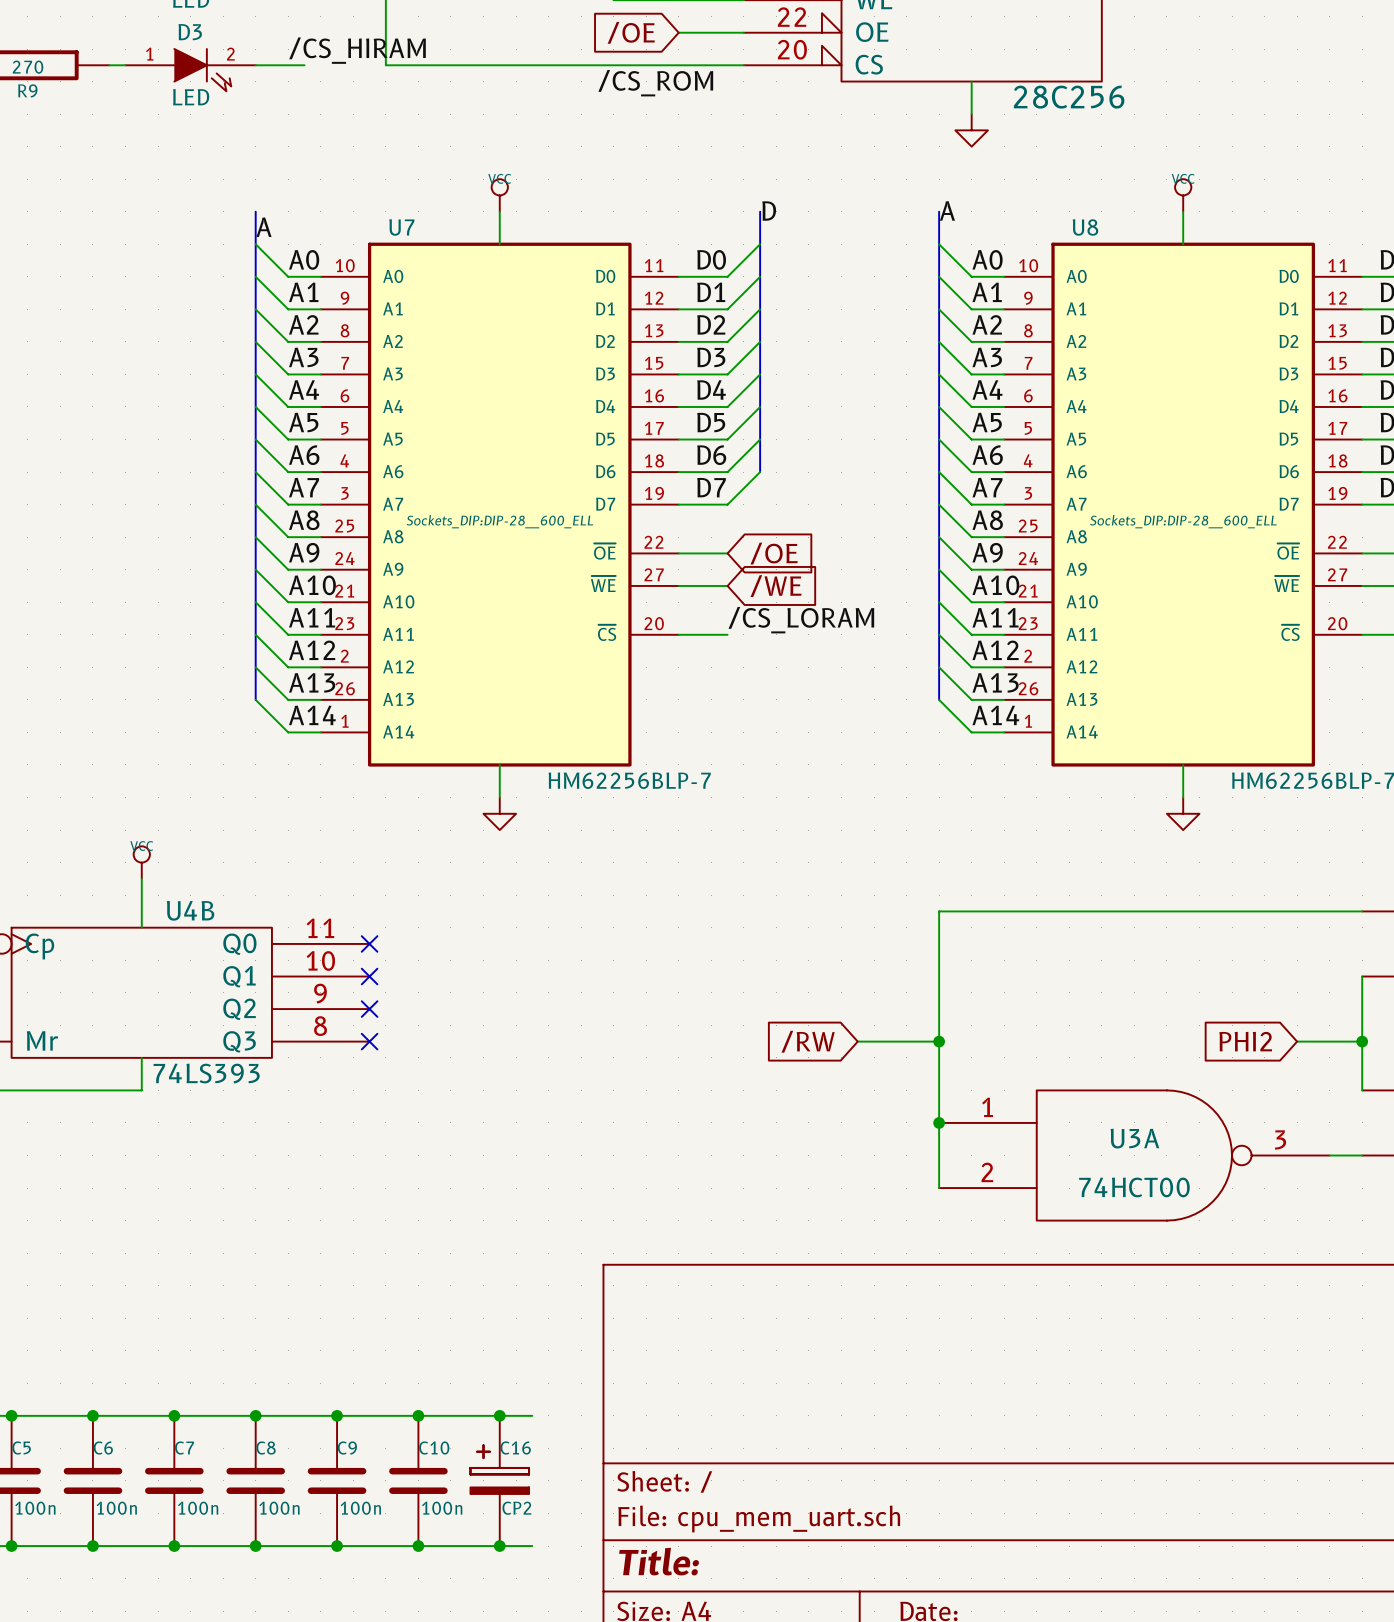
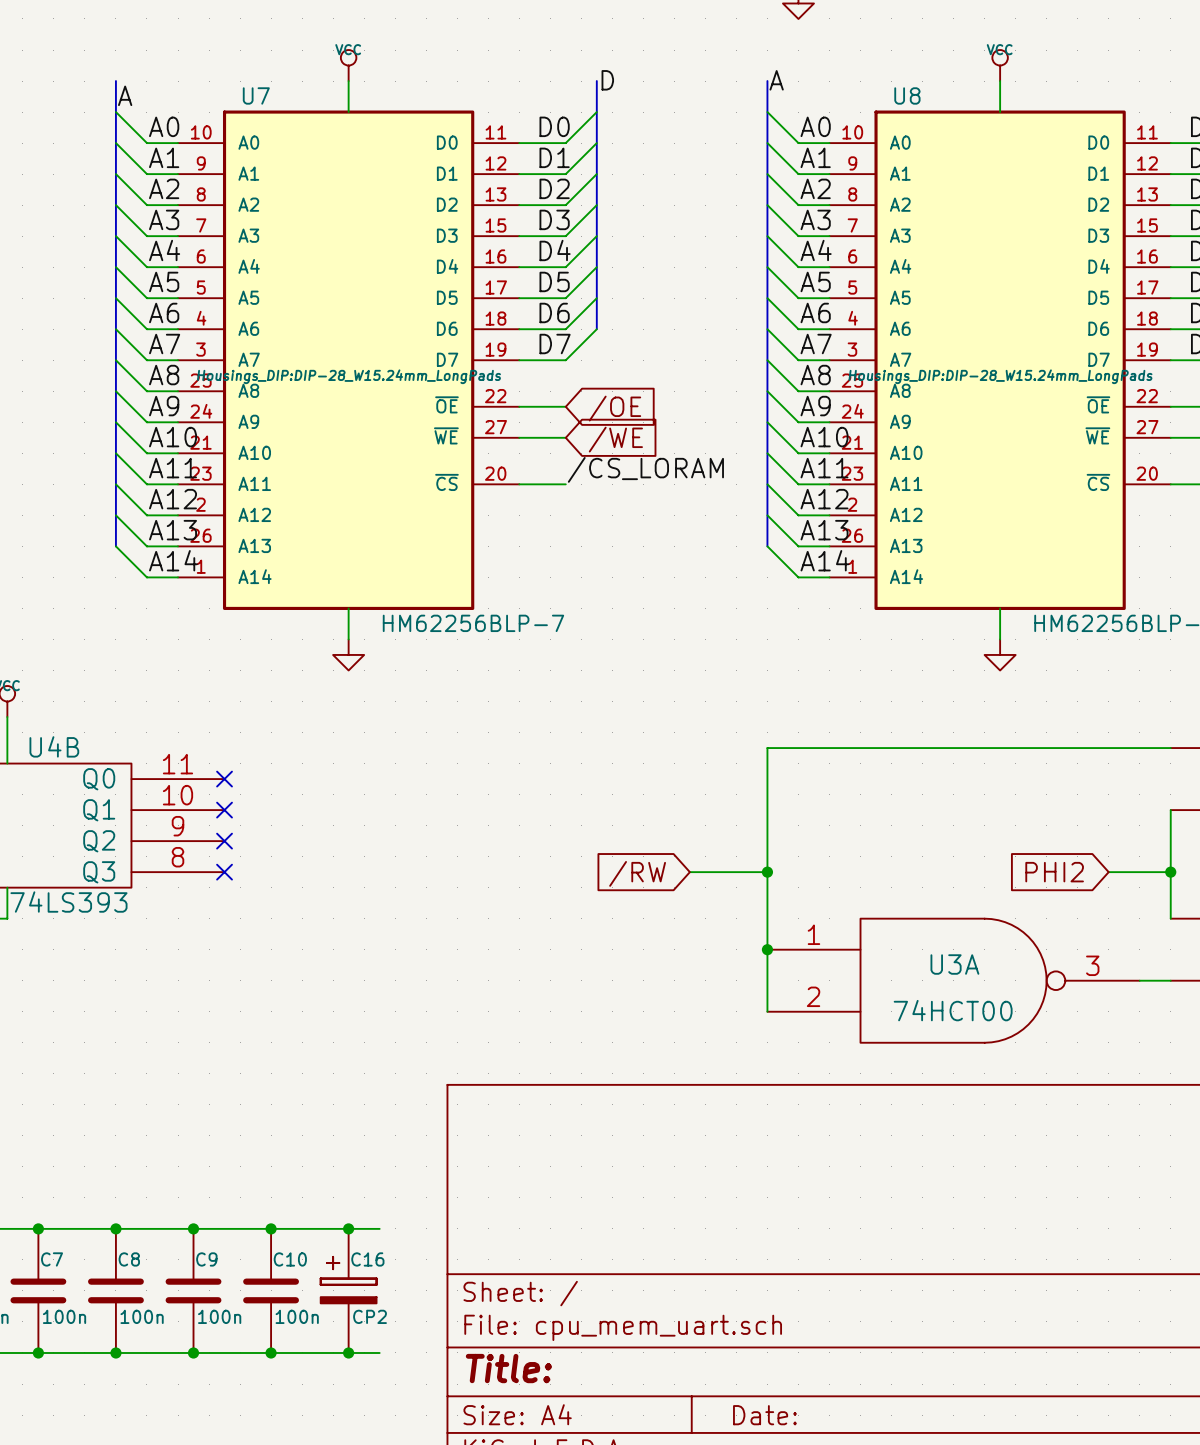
U7 text: Sockets_DIP:DIP-28__600_ELL (499, 521) -> Housings_DIP:DIP-28_W15.24mm_LongPads (348, 376)
U8 text: Sockets_DIP:DIP-28__600_ELL (1183, 521) -> Housings_DIP:DIP-28_W15.24mm_LongPads (1000, 376)

